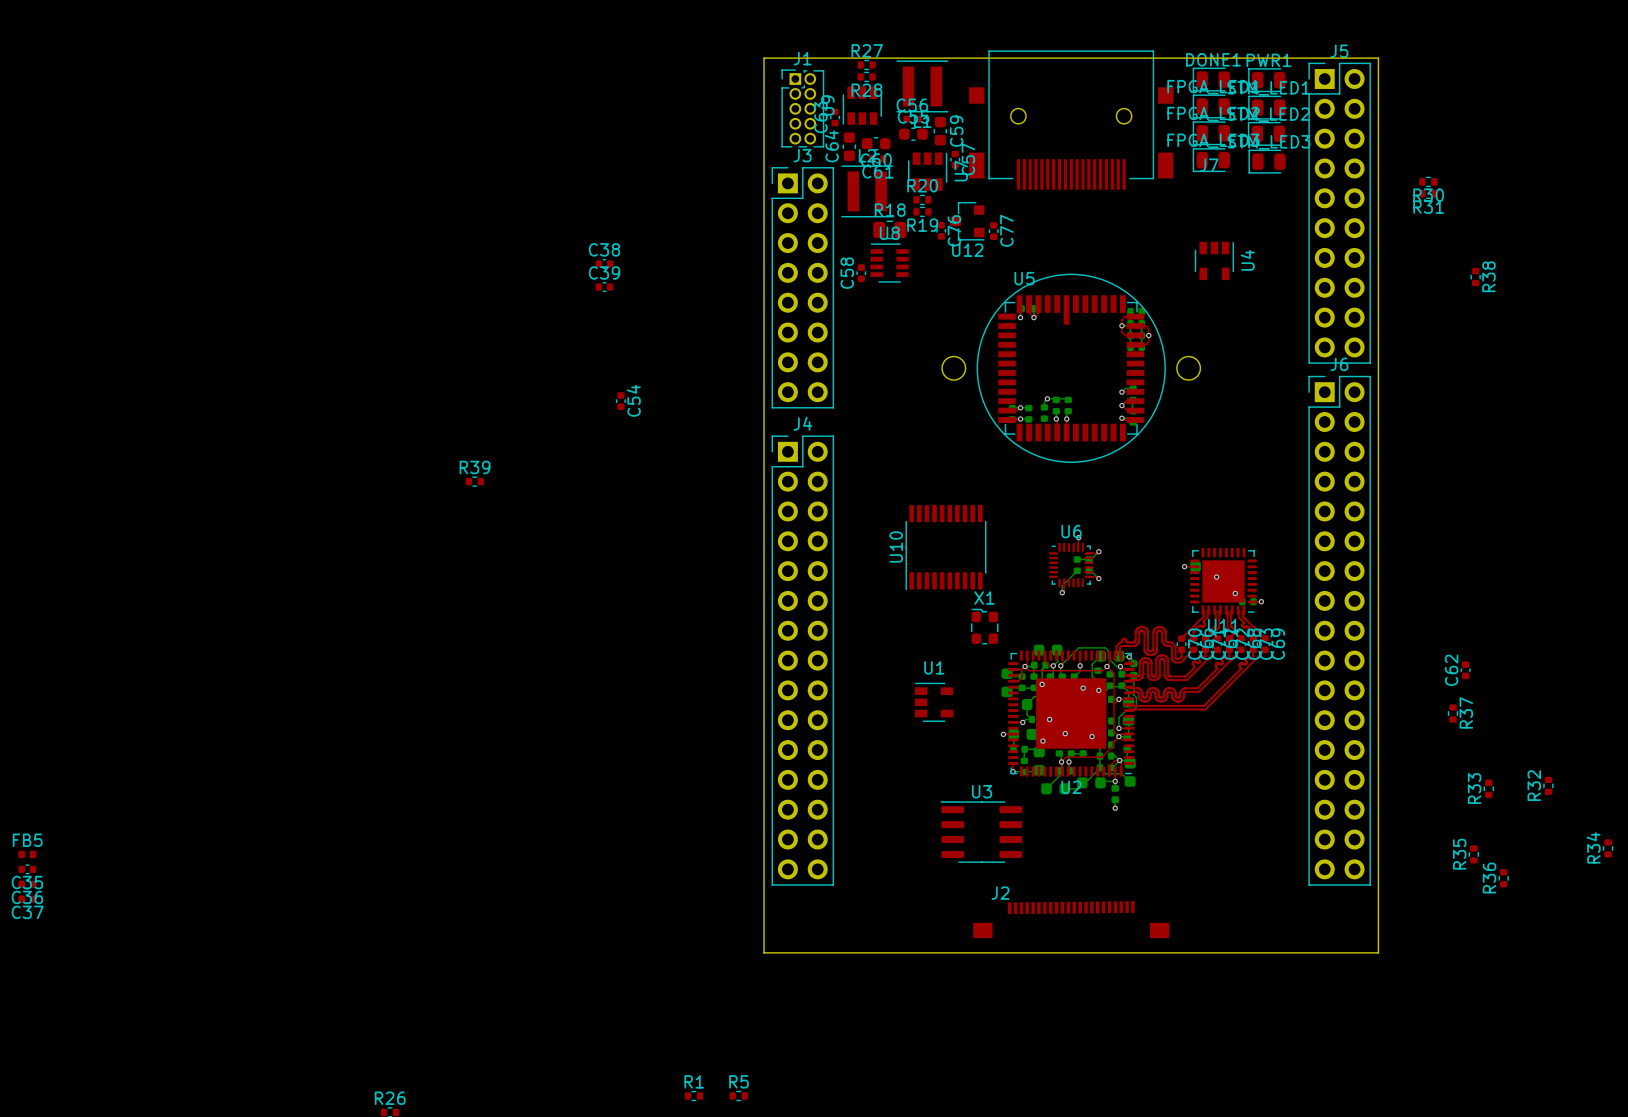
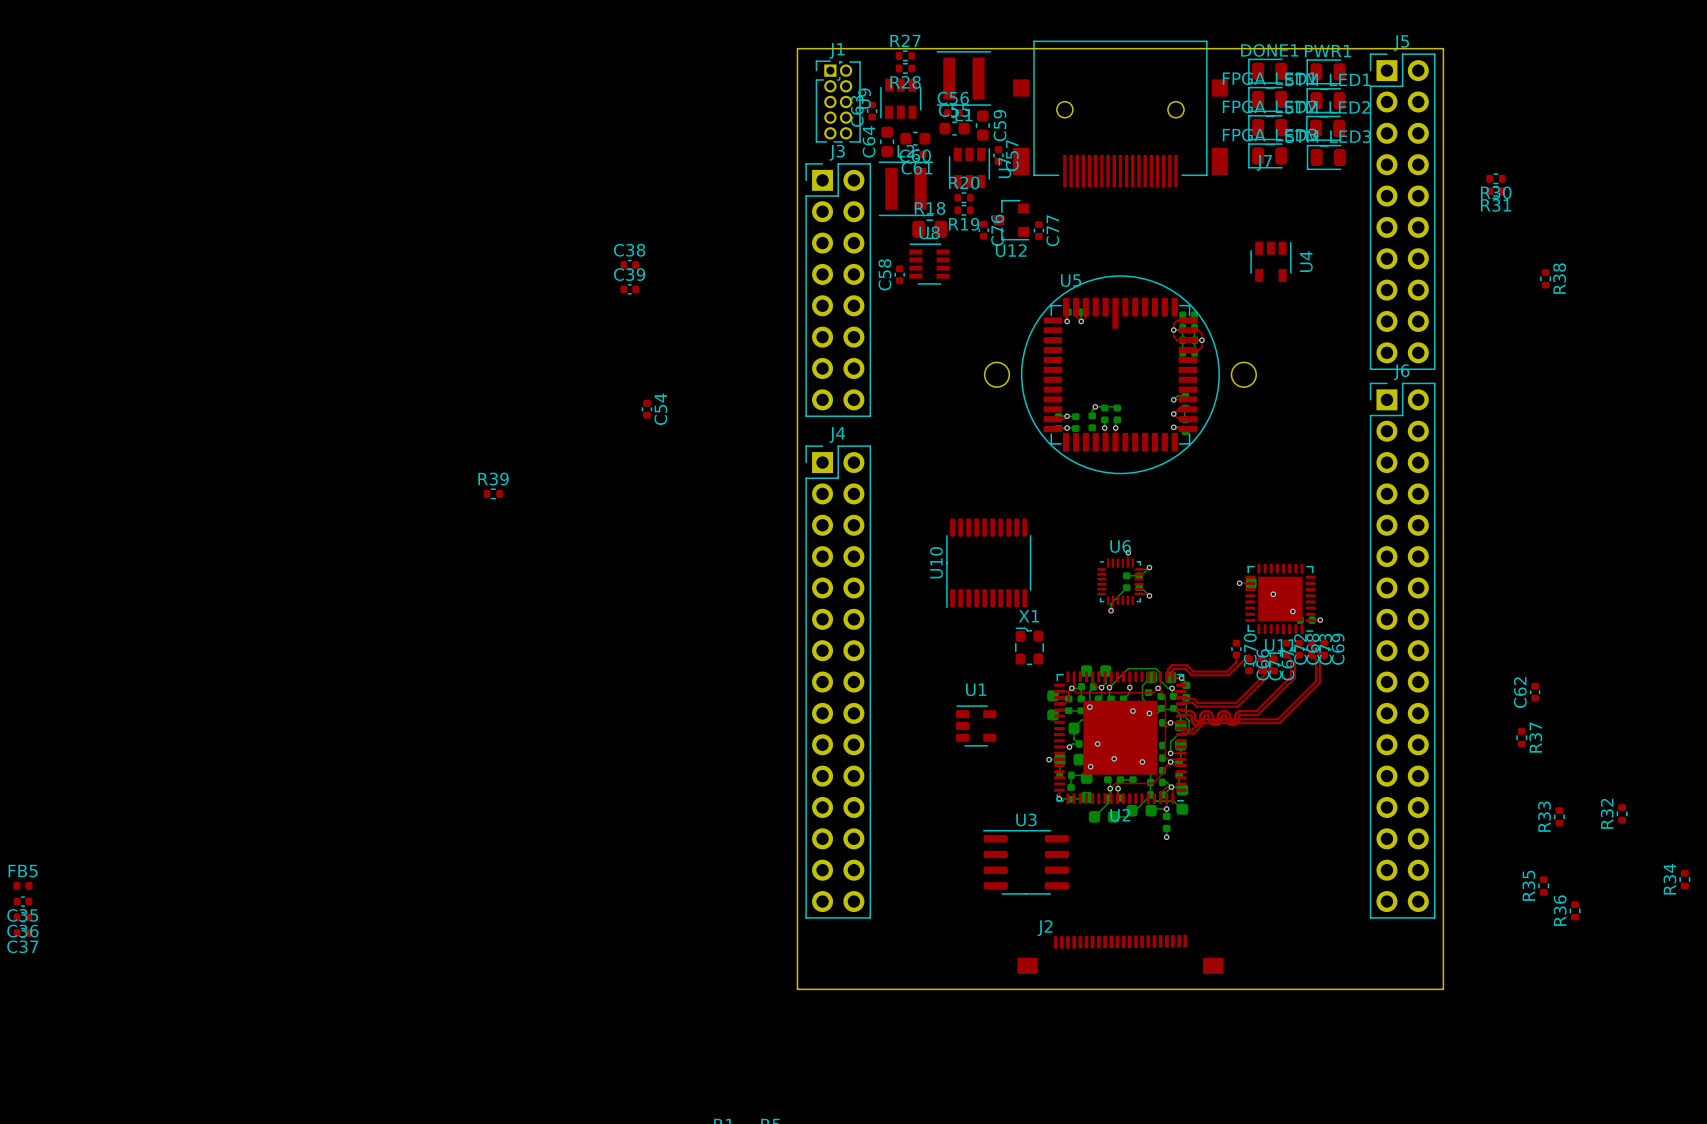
top track: (1202, 610) (1204, 616) (1181, 638) -> none
top track: (1208, 610) (1207, 617) (1203, 621) (1204, 625) (1199, 625) (1193, 631) (1193, 638) -> none
top track: (1214, 610) (1215, 625) (1205, 638) -> none
top track: (1220, 610) (1219, 627) (1213, 633) (1217, 638) -> none
top track: (1226, 610) (1227, 627) (1233, 633) (1229, 638) -> none
top track: (1232, 610) (1231, 626) (1241, 638) -> none
top track: (1238, 610) (1239, 617) (1243, 622) (1242, 626) (1248, 626) (1252, 631) -> none
top track: (1243, 610) (1242, 616) (1253, 627) -> none
C70 position: (1181, 644) -> (1236, 649)
C72 position: (1229, 644) -> (1286, 649)
C68 position: (1241, 644) -> (1299, 649)
C73 position: (1253, 644) -> (1311, 649)
C69 position: (1265, 644) -> (1324, 649)
top track: (1116, 648) (1123, 639) (1127, 642) (1134, 641) (1136, 630) (1142, 627) (1147, 630) (1148, 649) (1152, 651) (1153, 631) (1159, 627) (1165, 630) (1166, 641) (1171, 642) (1175, 646) (1176, 658) (1181, 656) (1181, 649) -> (1167, 669) (1172, 665) (1187, 665) (1193, 671) (1227, 671) (1236, 662) (1236, 655)
top track: (1193, 649) (1180, 662) (1174, 662) (1172, 659) (1172, 647) (1163, 643) (1162, 632) (1159, 630) (1157, 632) (1156, 651) (1153, 654) (1147, 654) (1144, 650) (1144, 632) (1141, 630) (1139, 632) (1136, 644) (1121, 645) (1119, 650) -> (1248, 655) (1228, 675) (1191, 675) (1185, 669) (1173, 669) (1171, 671)
top track: (1205, 649) (1205, 656) (1199, 656) (1199, 662) (1193, 662) (1193, 668) (1185, 676) (1169, 675) (1167, 659) (1162, 655) (1156, 659) (1155, 675) (1151, 674) (1150, 661) (1145, 658) (1140, 661) (1139, 674) (1137, 676) -> (1261, 655) (1265, 659) (1265, 673) (1236, 702) (1198, 702) (1193, 698) (1189, 698)
top track: (1217, 649) (1187, 680) (1166, 678) (1164, 675) (1164, 660) (1162, 658) (1159, 660) (1159, 675) (1157, 678) (1153, 680) (1149, 677) (1147, 663) (1145, 661) (1143, 663) (1142, 676) (1137, 680) -> (1274, 655) (1269, 659) (1269, 674) (1238, 706) (1196, 706) (1190, 702)
top track: (1229, 649) (1229, 656) (1222, 657) (1222, 663) (1216, 664) (1216, 669) -> none
top track: (1241, 649) (1199, 691) -> (1299, 655) (1294, 659) (1294, 678) (1257, 714) (1254, 714)
top track: (1253, 649) (1253, 656) (1246, 657) (1246, 663) (1239, 664) (1240, 669) -> none
top track: (1265, 649) (1205, 709) (1141, 709) -> (1324, 655) (1319, 659) (1319, 682) (1279, 723) (1204, 723) (1194, 733)
top track: (1216, 669) (1197, 688) -> (1286, 655) (1291, 659) (1291, 676) (1256, 711) (1253, 711)
top track: (1240, 669) (1203, 705) (1139, 705) -> (1311, 655) (1316, 659) (1316, 681) (1277, 719) (1202, 719) (1192, 729)

